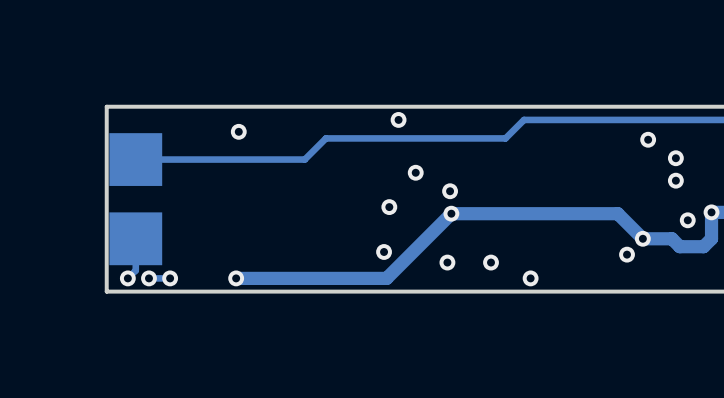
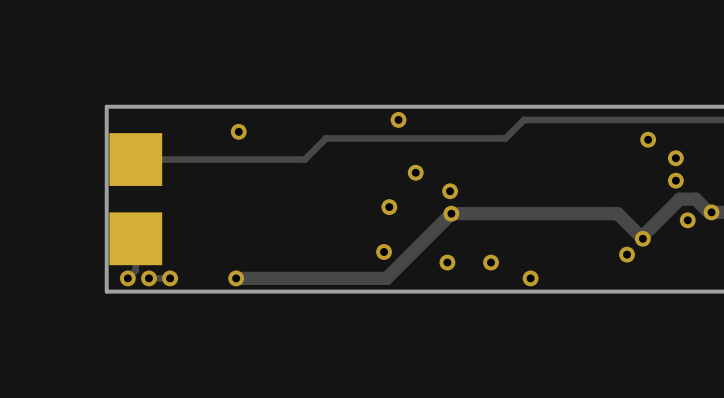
track: (711, 212) (711, 238) (703, 246) (679, 246) (671, 238) (642, 238) -> (711, 212) (708, 212) (695, 199) (679, 199) (642, 236) (642, 238)

